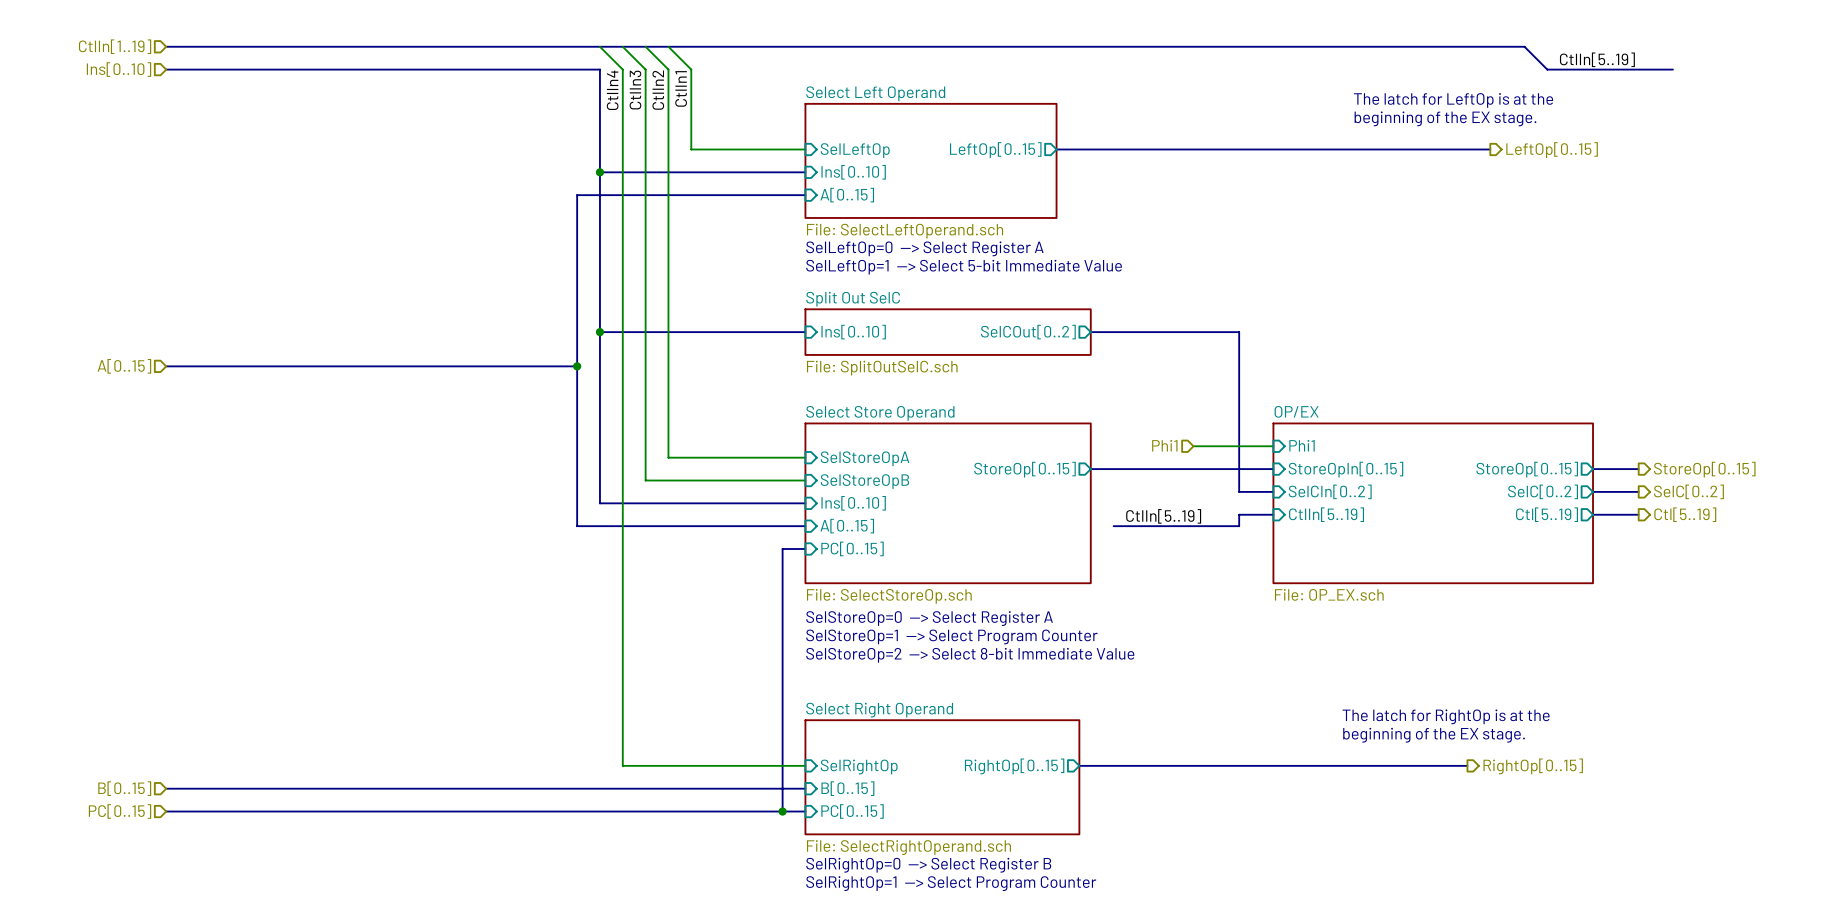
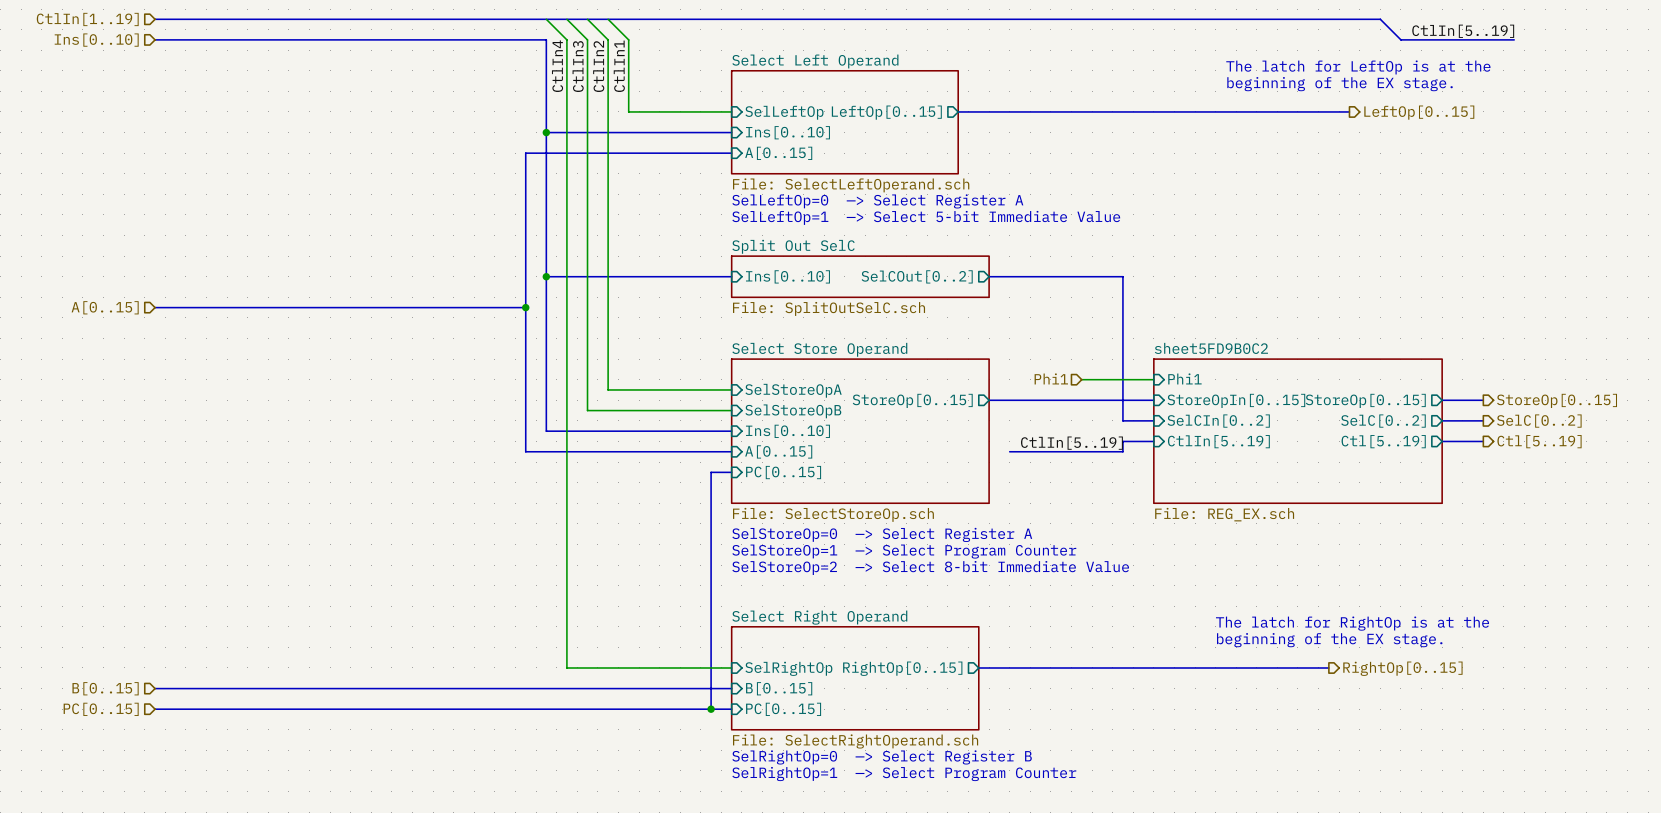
sheet OP/EX name: OP/EX (1296, 411) -> sheet5FD9B0C2 (1211, 348)
sheet OP/EX value: File: OP_EX.sch (1329, 594) -> File: REG_EX.sch (1224, 514)

